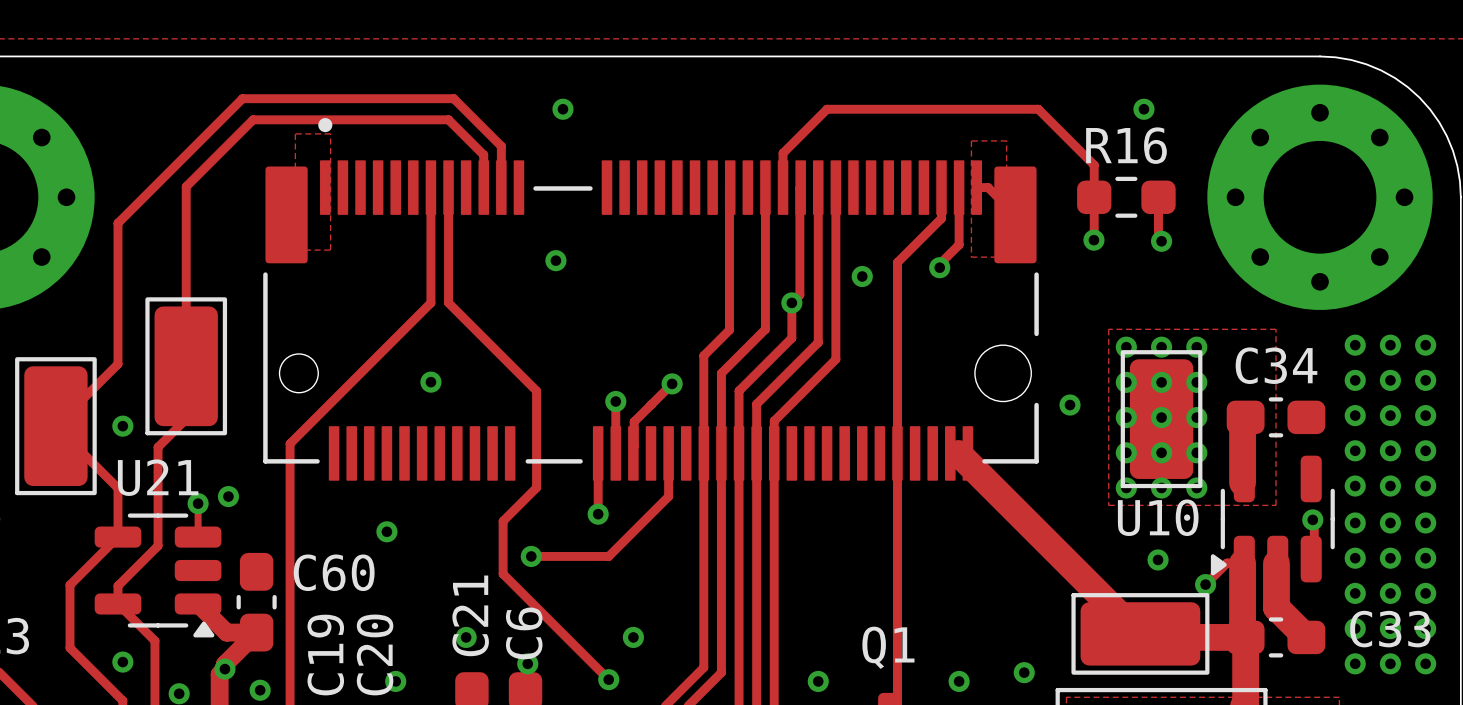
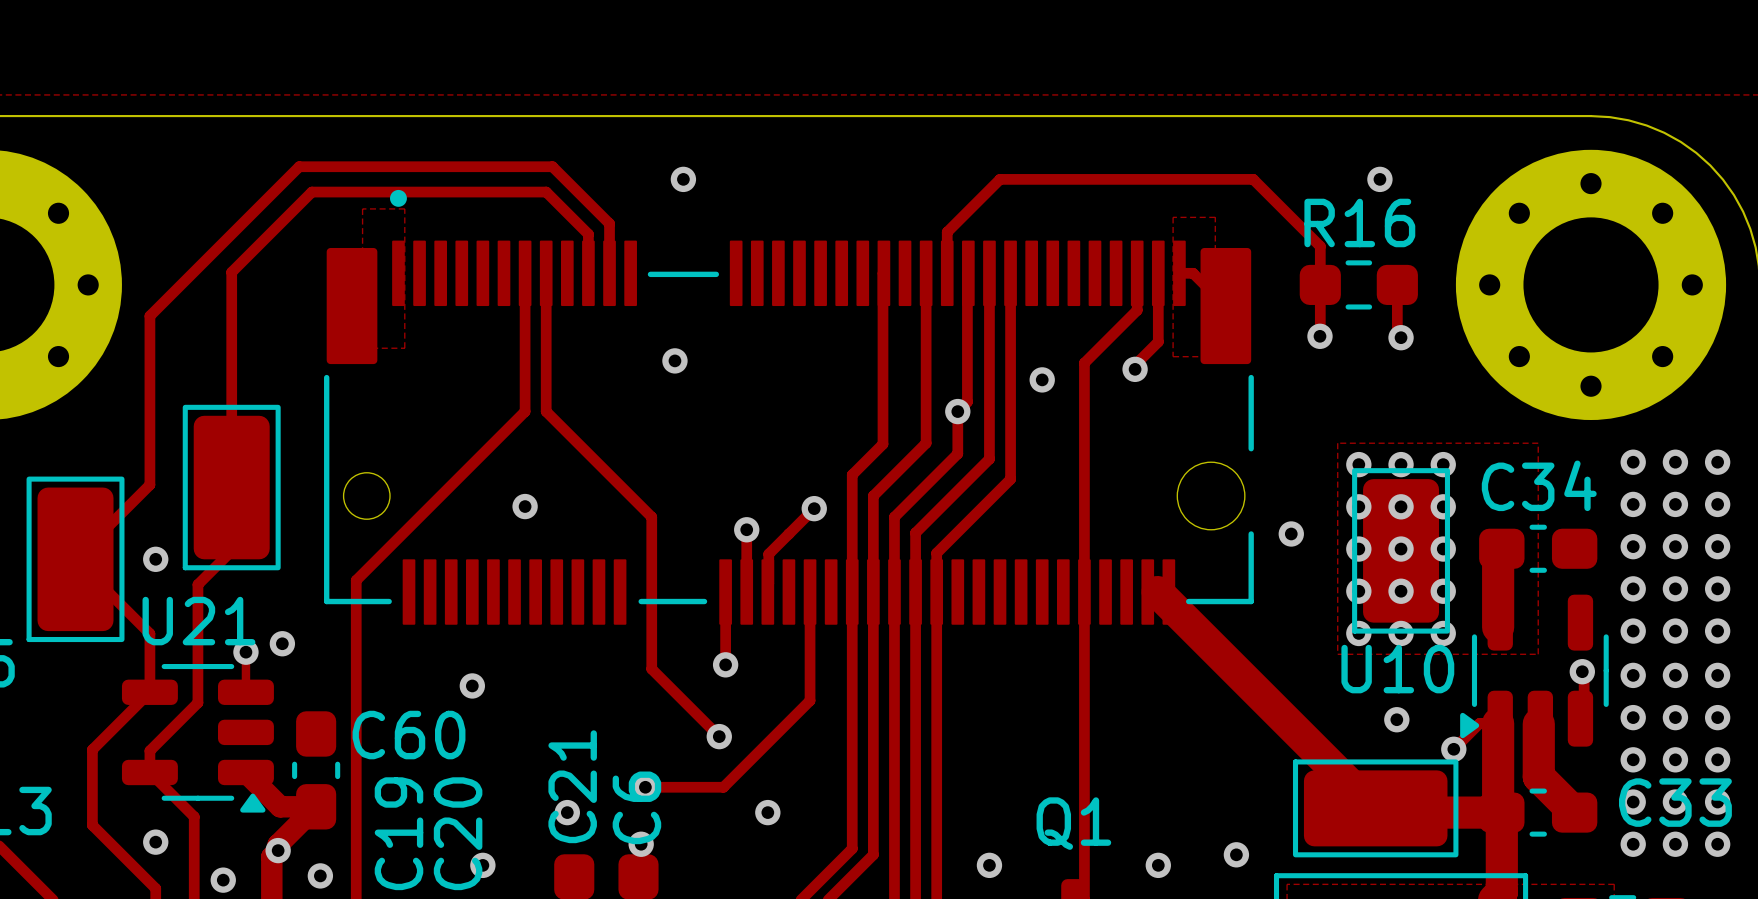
track: (536, 487) (503, 521) (503, 574) (608, 679) -> (651, 633) (651, 669) (719, 736)
track: (668, 496) (608, 556) (531, 556) -> (810, 643) (810, 700) (723, 787) (645, 787)
via: (531, 556) -> none
via: none -> (719, 736)
via: none -> (645, 787)
via: (608, 679) -> none

